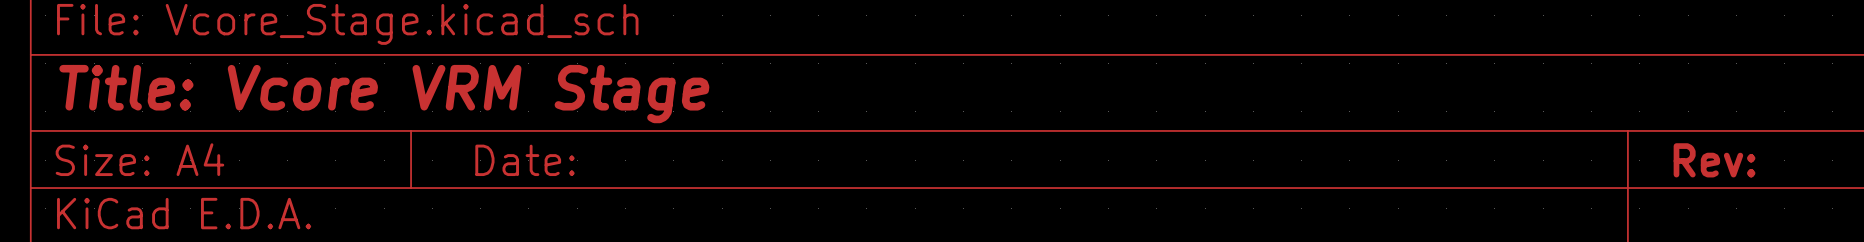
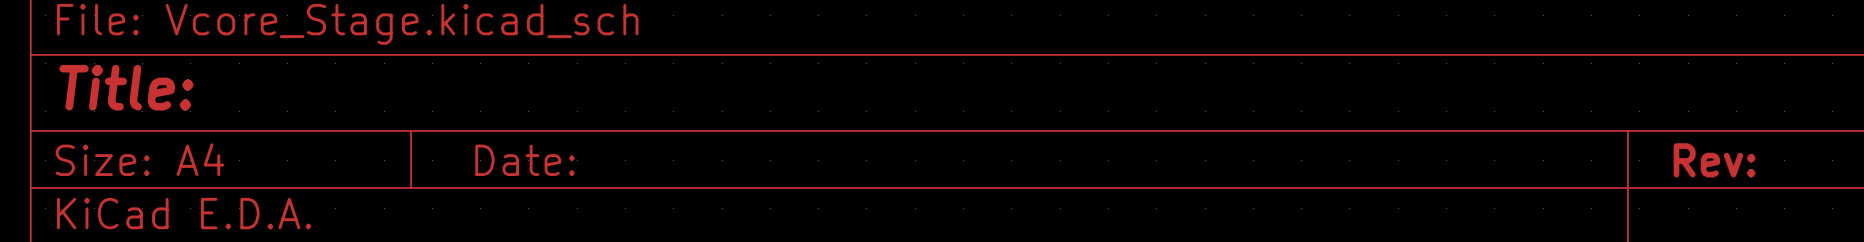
title block: Title: Vcore VRM Stage (384, 94) -> Title: (126, 87)

